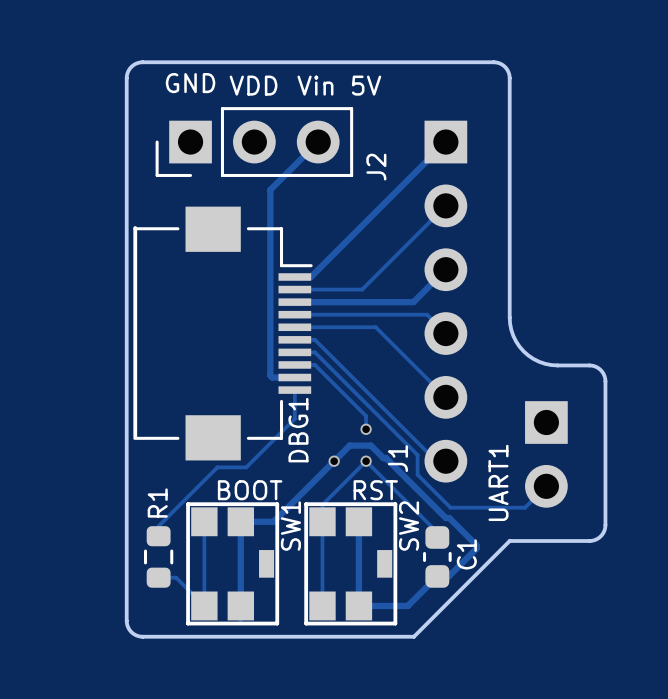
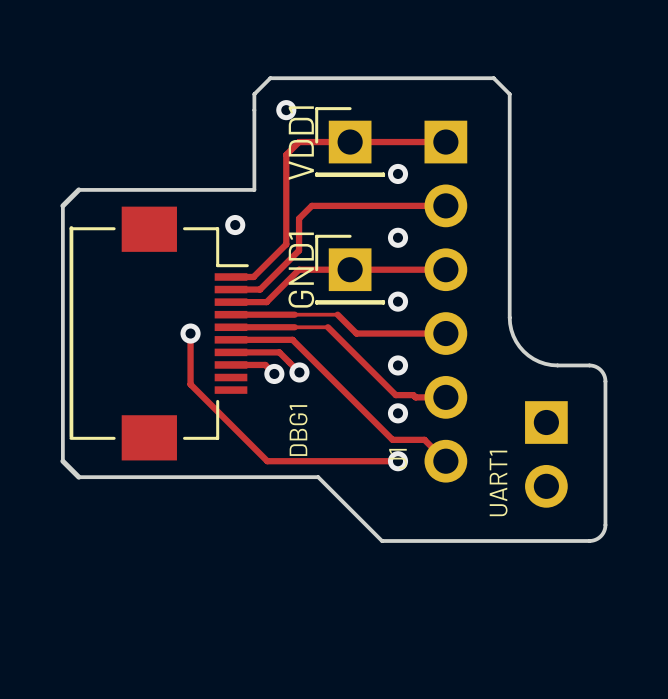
text: GND (190, 83) -> none
text: VDD (253, 85) -> none
text: Vin 5V (339, 85) -> none
board edge: (509, 94) (508, 72) (503, 65) (495, 62) (142, 62) (136, 63) (130, 68) (126, 78) (126, 620) (131, 632) (142, 636) -> (509, 94) (493, 78) (270, 78) (254, 94) (254, 189) (78, 189) (62, 205) (62, 461) (78, 477) (318, 477) (382, 541) (509, 541)
via: none -> (286, 110)
J2: (254, 142) -> none
track: (318, 142) (270, 189) (270, 375) (272, 377) (294, 377) -> none
VDD1: none -> (350, 142)
track: (445, 142) (310, 277) (294, 277) -> (445, 142) (299, 142) (286, 154) (286, 244) (253, 277) (231, 277)
via: none -> (398, 173)
track: (445, 205) (362, 289) (294, 289) -> (445, 205) (311, 205) (299, 218) (299, 250) (260, 289) (231, 289)
via: none -> (235, 225)
via: none -> (398, 237)
GND1: none -> (350, 269)
track: (445, 269) (413, 302) (294, 302) -> (445, 269) (299, 269) (266, 302) (231, 302)
via: none -> (398, 301)
track: none -> (231, 314) (294, 314)
track: (337, 314) (427, 314) (445, 333) -> (337, 314) (356, 333) (445, 333)
track: none -> (231, 327) (294, 327)
track: (327, 327) (375, 327) (445, 397) -> (327, 327) (395, 395) (445, 397)
track: none -> (190, 333) (190, 384) (267, 461) (398, 461)
via: none -> (190, 333)
DBG1 position: (222, 333) -> (159, 333)
track: (294, 339) (314, 339) (436, 461) (445, 461) -> (231, 339) (292, 339) (392, 439) (424, 439) (445, 461)
track: none -> (231, 352) (279, 352) (299, 372)
track: (294, 352) (314, 352) (417, 455) (417, 474) (450, 507) (525, 507) (546, 486) -> none
track: none -> (231, 364) (265, 364) (274, 373)
track: (294, 364) (314, 364) (366, 416) (366, 429) -> none
via: none -> (398, 365)
via: none -> (299, 372)
via: none -> (274, 373)
track: (294, 390) (294, 418) (246, 467) (217, 467) (158, 526) (158, 536) -> none
via: none -> (398, 413)
via: (366, 429) -> none
via: (334, 461) -> none
via: (366, 461) -> none
via: none -> (398, 461)
track: (204, 521) (204, 605) (176, 577) (158, 577) -> none
track: (358, 521) (358, 605) (407, 605) (437, 576) (448, 576) (476, 548) (476, 545) (449, 518) (445, 518) (370, 445) (349, 445) (273, 521) (240, 521) (240, 618) -> none
track: (437, 537) (437, 532) (366, 461) (322, 504) (322, 605) -> none
board edge: (509, 541) (413, 636) (142, 636) -> none
R1: (158, 556) -> none
C1: (437, 556) -> none
SW1: BOOT (232, 563) -> none
SW2: RST (350, 563) -> none

